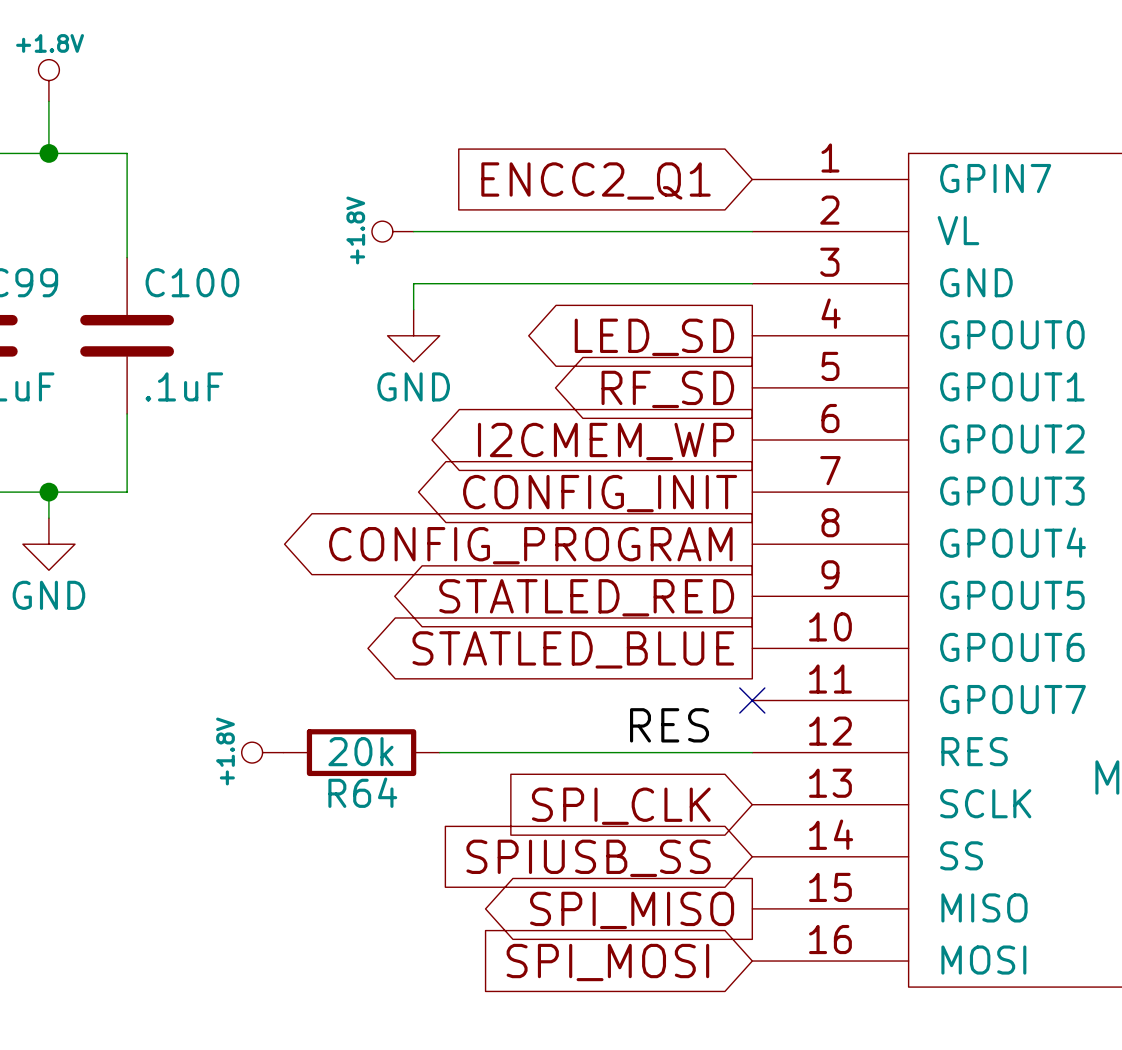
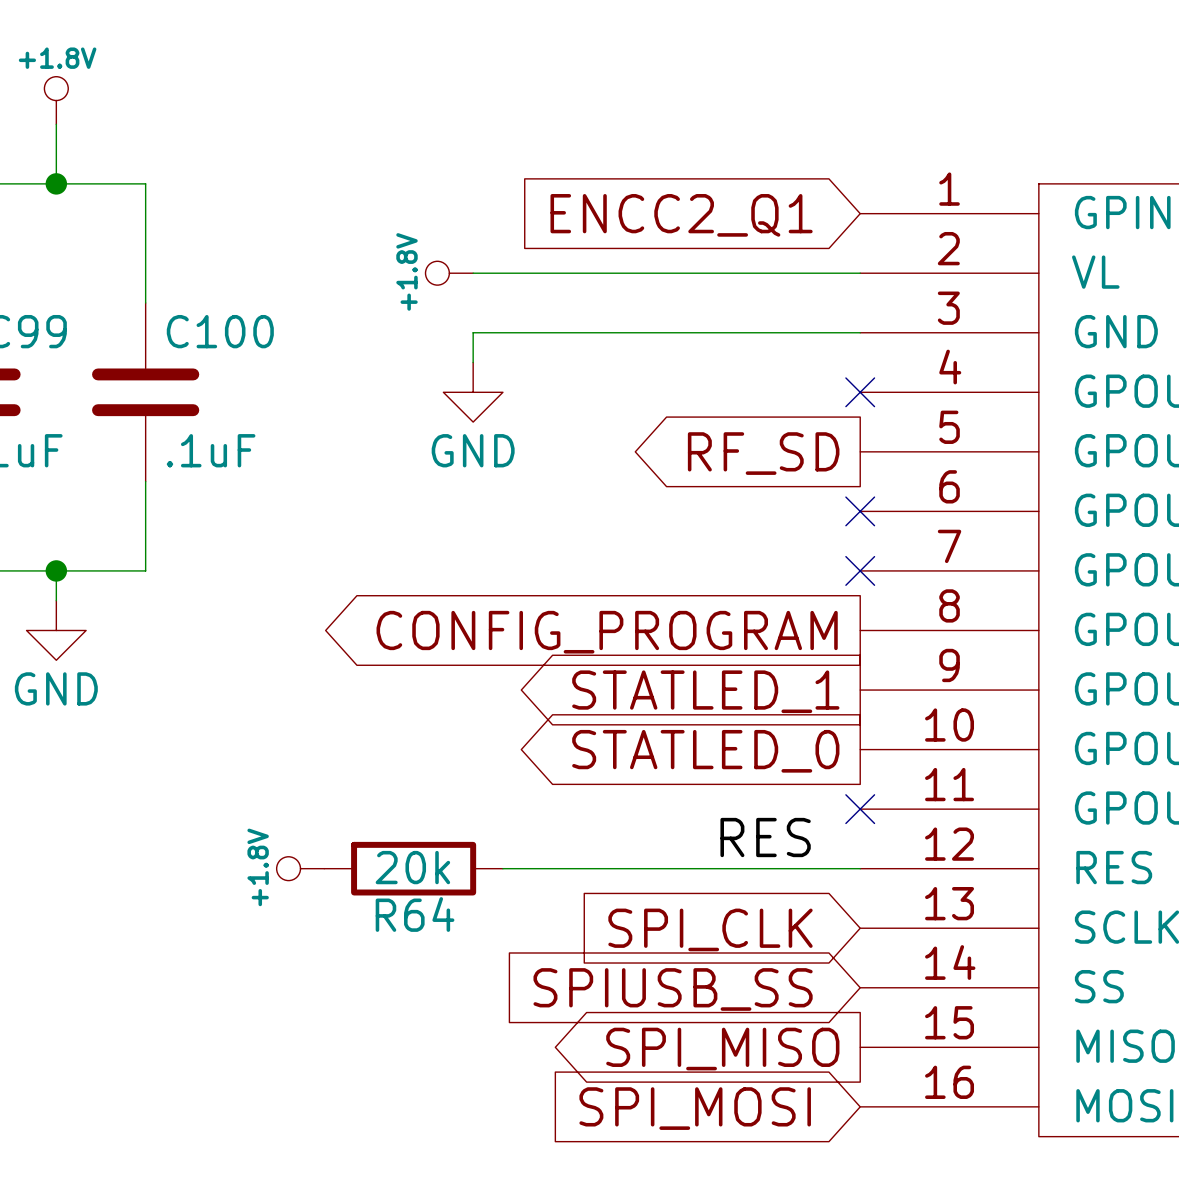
no-connect mark: none -> (860, 392)
global label: LED_SD (654, 337) -> none
no-connect mark: none -> (860, 511)
global label: I2CMEM_WP (606, 441) -> none
no-connect mark: none -> (860, 570)
global label: CONFIG_INIT (600, 493) -> none
global label: STATLED_RED (586, 597) -> STATLED_1 (705, 691)
global label: STATLED_BLUE (573, 649) -> STATLED_0 (705, 751)

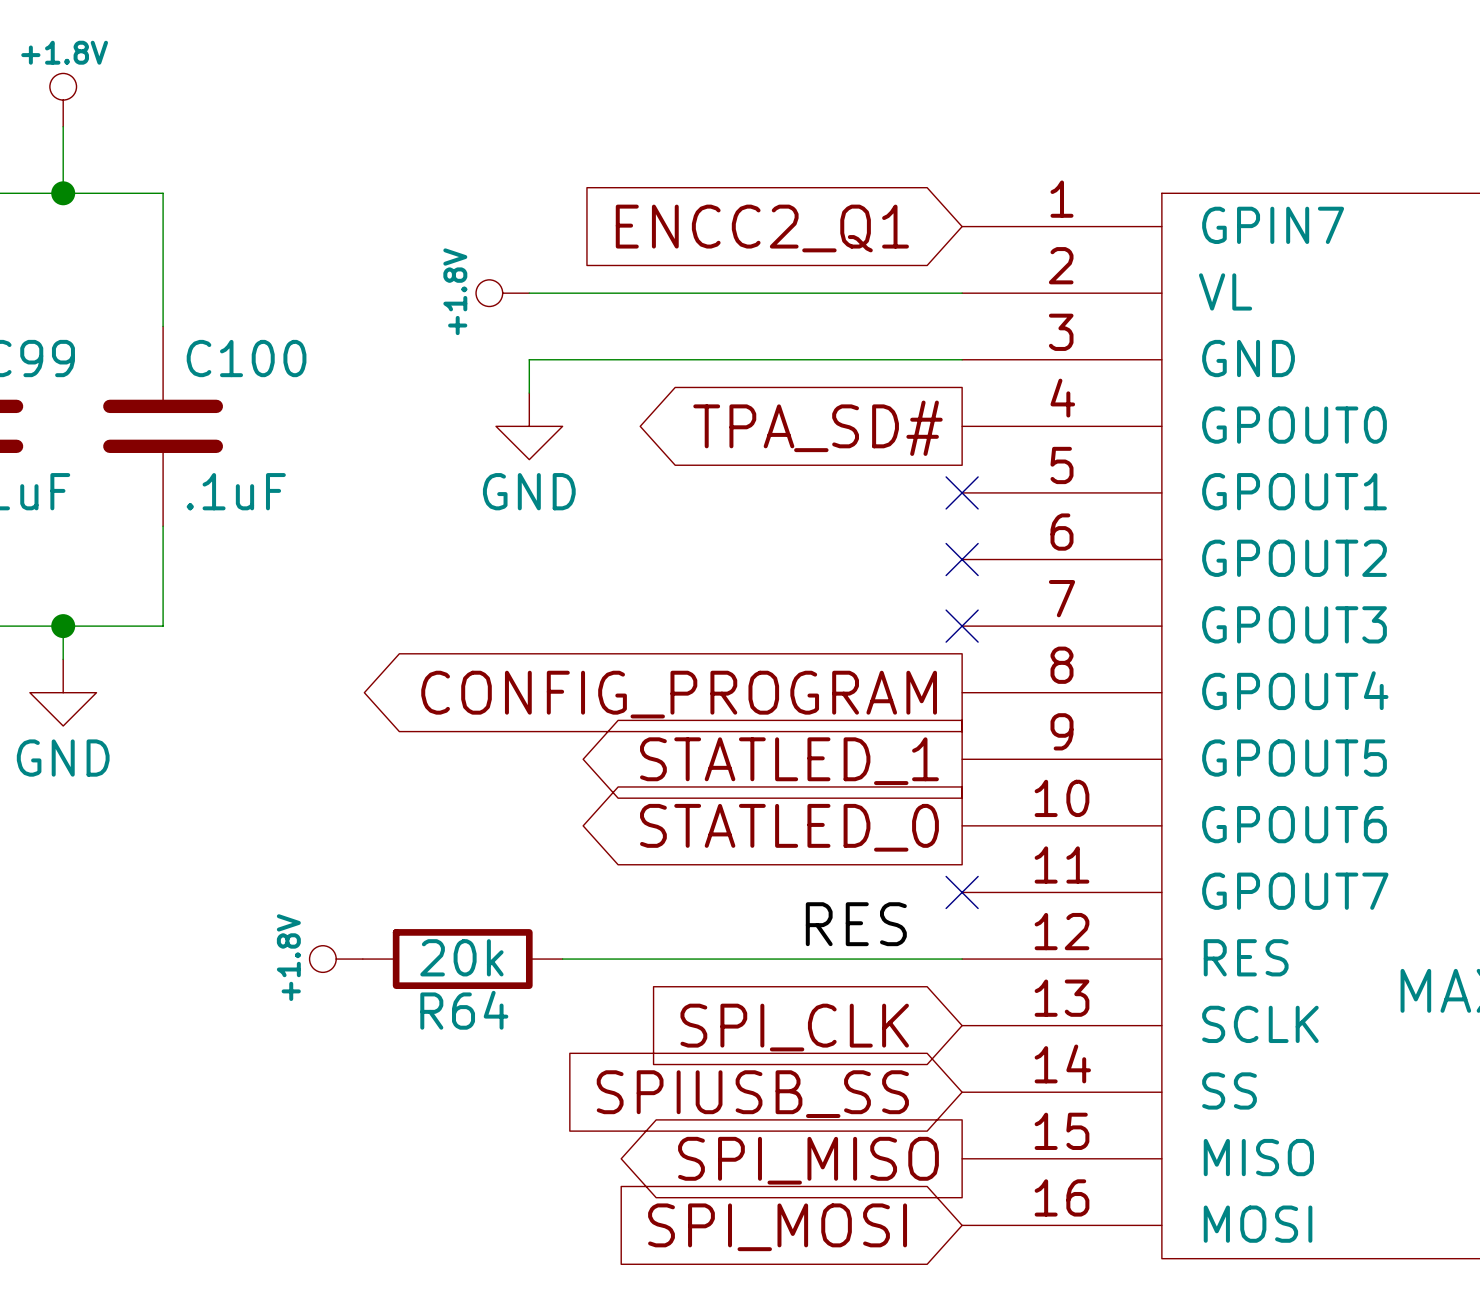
no-connect mark position: (860, 392) -> (962, 492)
global label: none -> TPA_SD# (818, 428)
global label: RF_SD (763, 453) -> none

